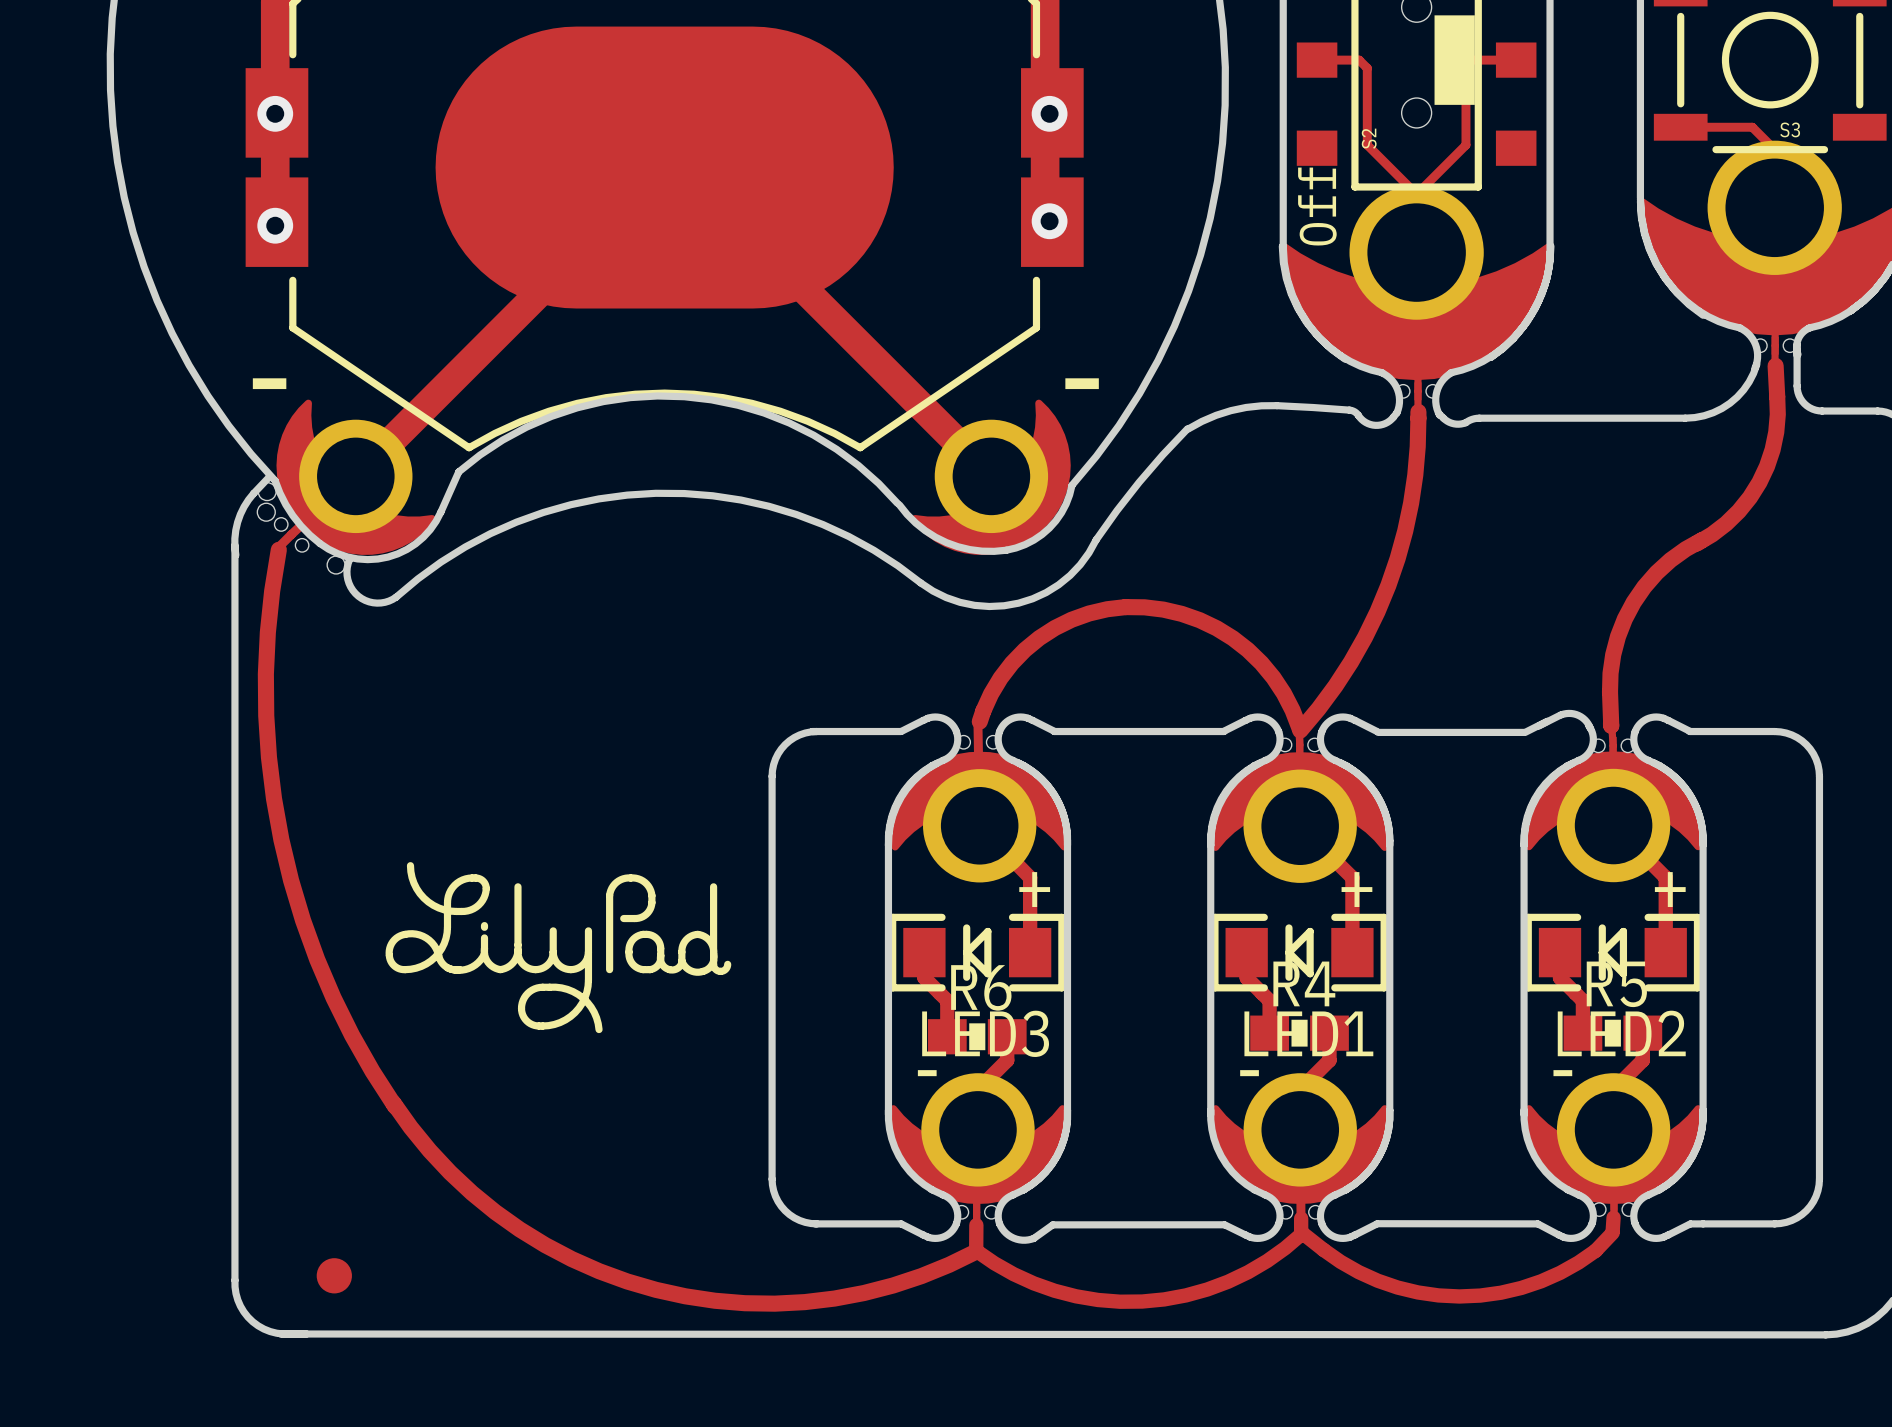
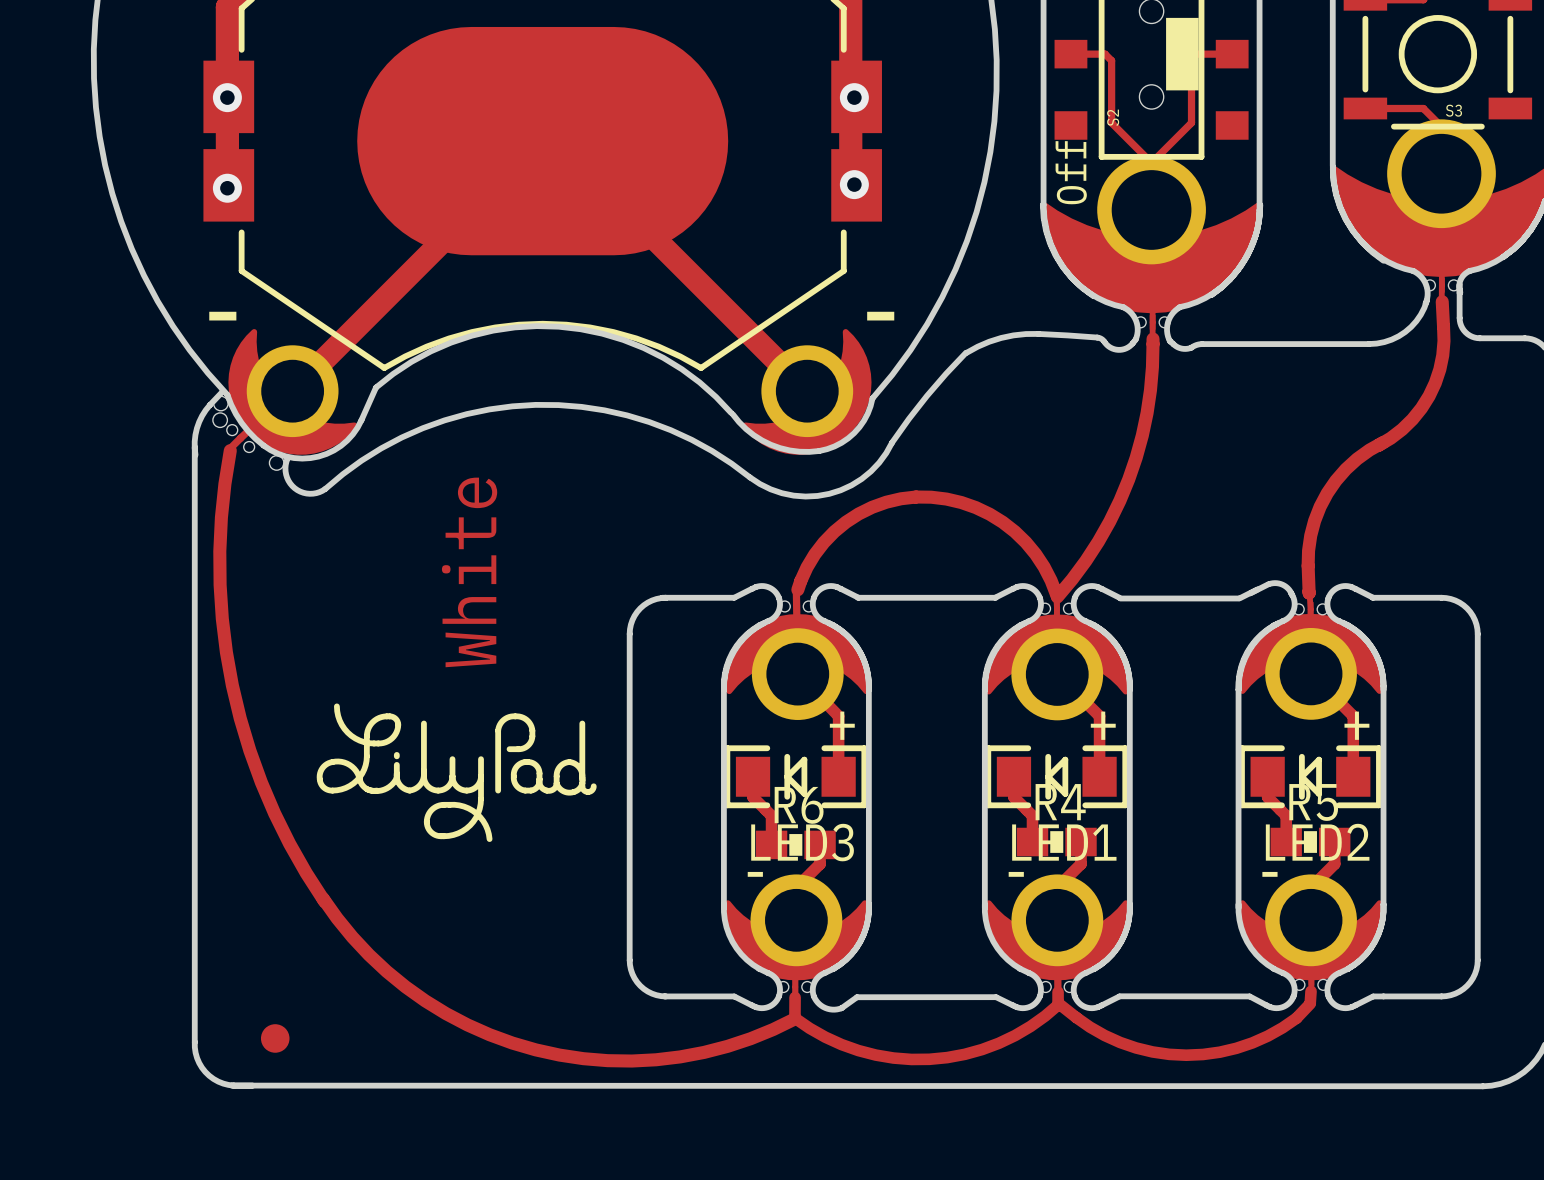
text: none -> White (469, 572)

